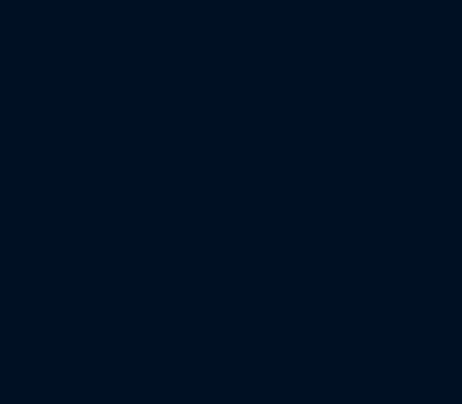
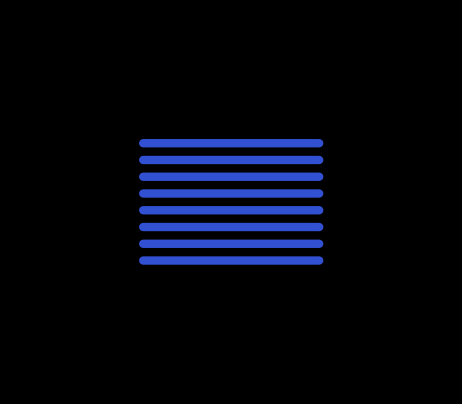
track: none -> (319, 143) (143, 143)
track: none -> (319, 159) (143, 159)
track: none -> (319, 176) (143, 176)
track: none -> (319, 193) (143, 193)
track: none -> (319, 210) (143, 210)
track: none -> (319, 227) (143, 227)
track: none -> (319, 243) (143, 243)
track: none -> (319, 260) (143, 260)

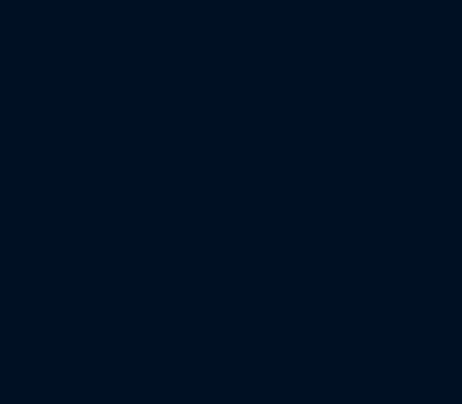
track: (319, 143) (143, 143) -> none
track: (319, 159) (143, 159) -> none
track: (319, 176) (143, 176) -> none
track: (319, 193) (143, 193) -> none
track: (319, 210) (143, 210) -> none
track: (319, 227) (143, 227) -> none
track: (319, 243) (143, 243) -> none
track: (319, 260) (143, 260) -> none

